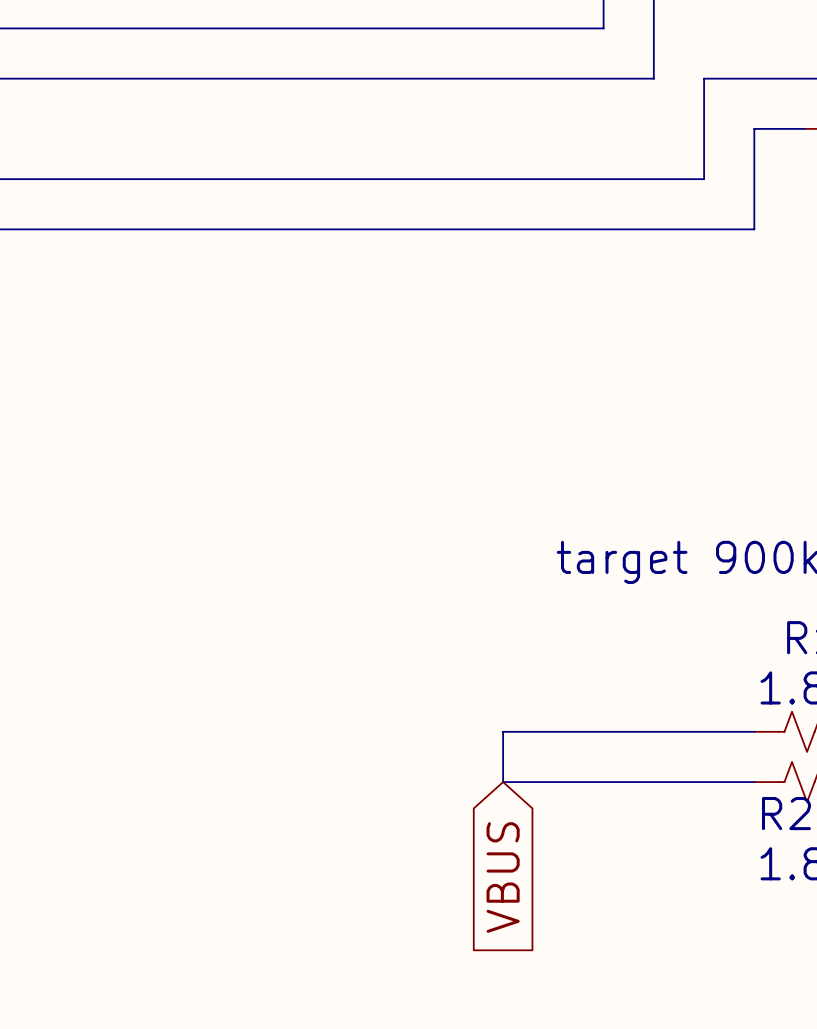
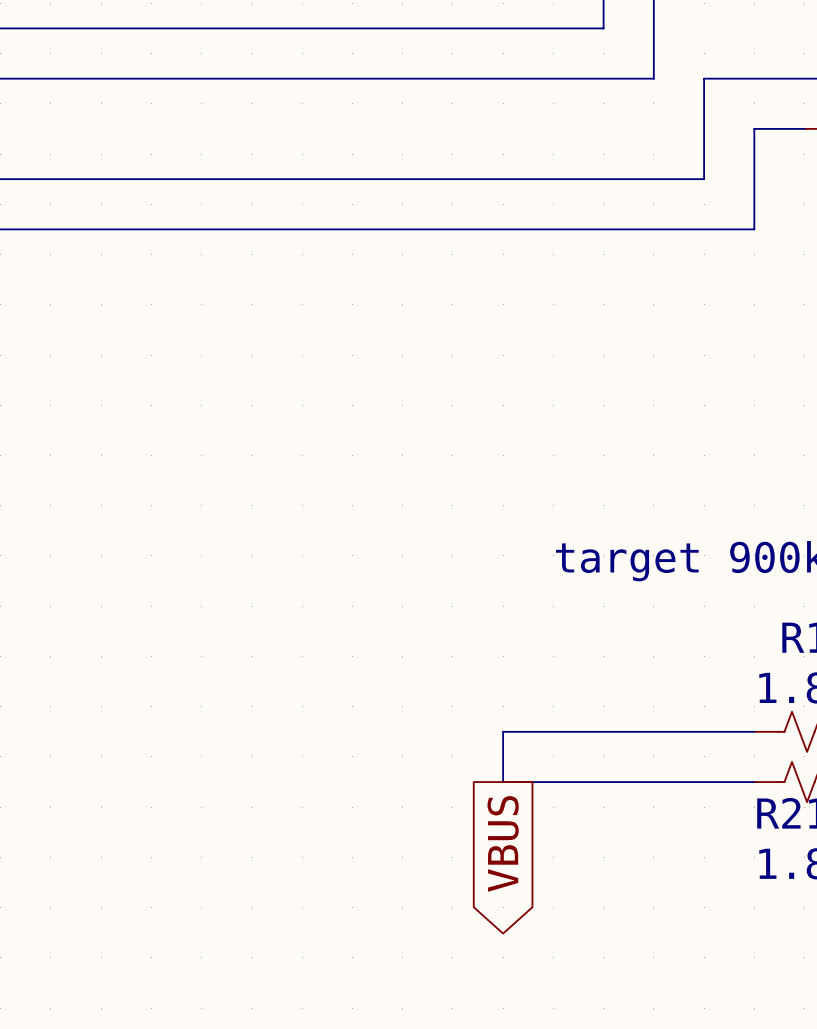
global label shape: input (503, 877) -> output (503, 843)

